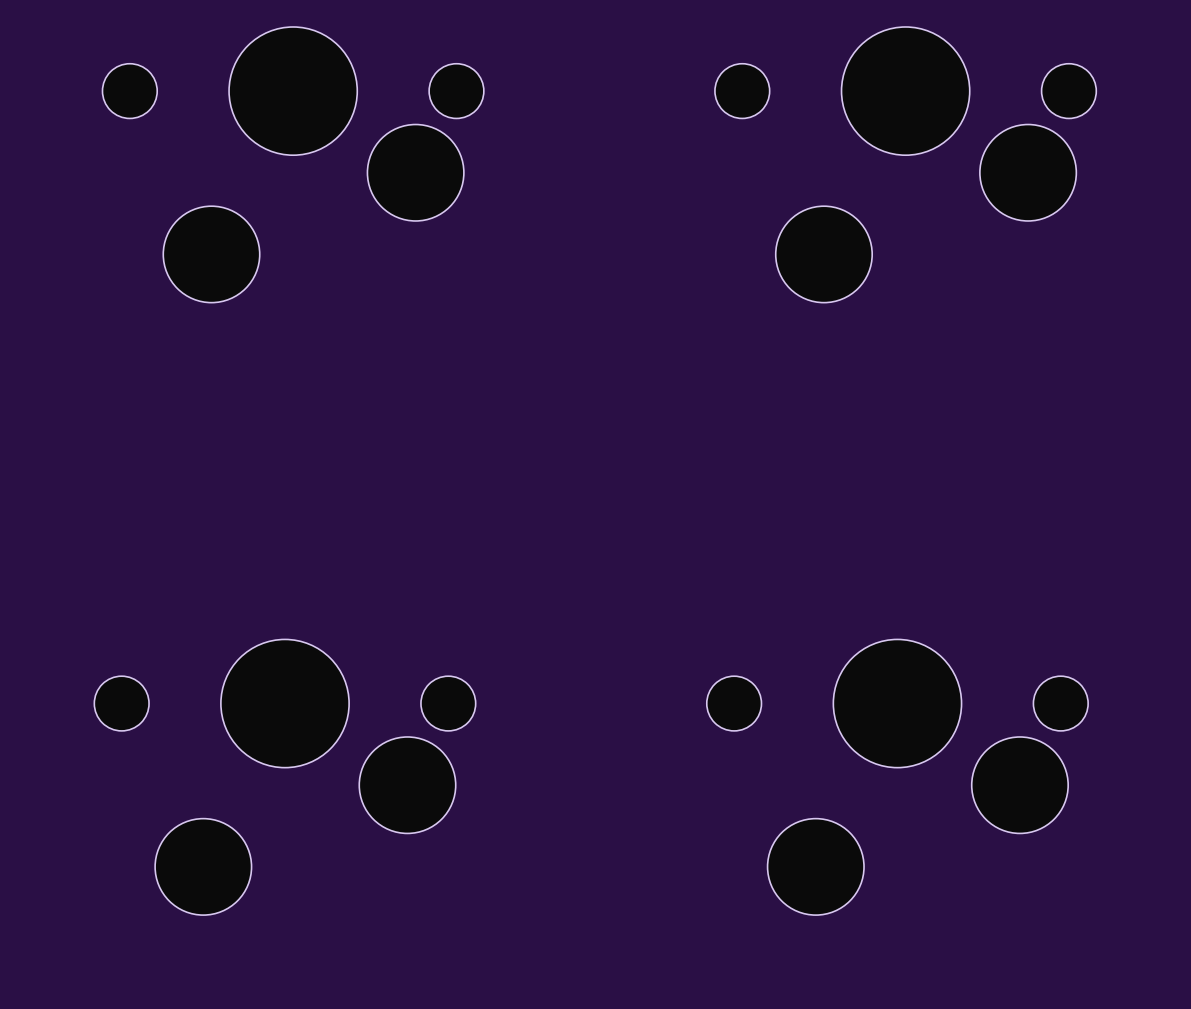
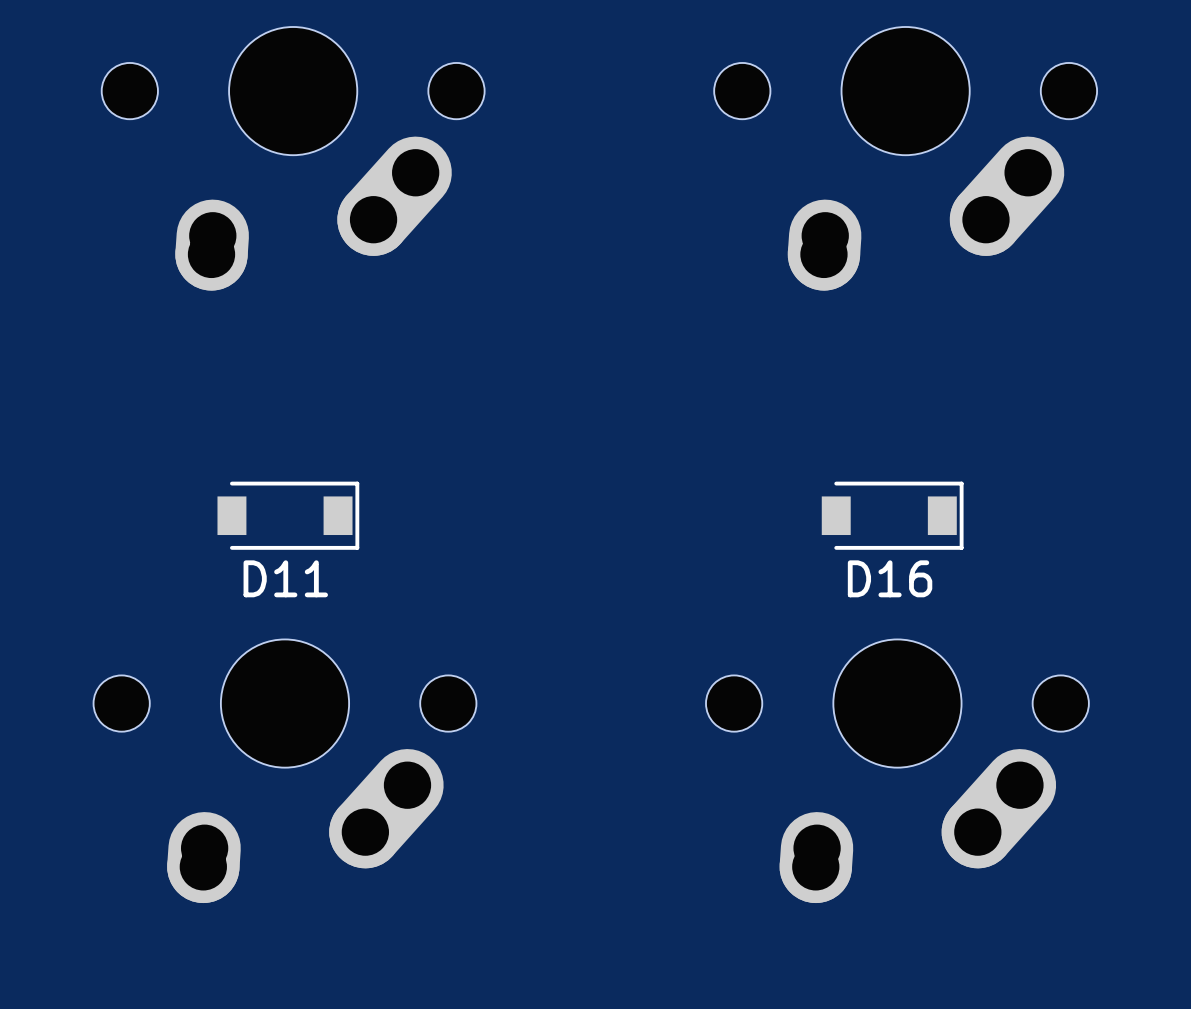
part footprint: [102, 26, 484, 303] -> [101, 26, 485, 291]
part footprint: [714, 26, 1097, 303] -> [714, 26, 1098, 291]
D11: none -> (288, 515)
D16: none -> (892, 515)
part footprint: [94, 639, 476, 916] -> [93, 639, 477, 904]
part footprint: [706, 639, 1089, 916] -> [706, 639, 1089, 904]

